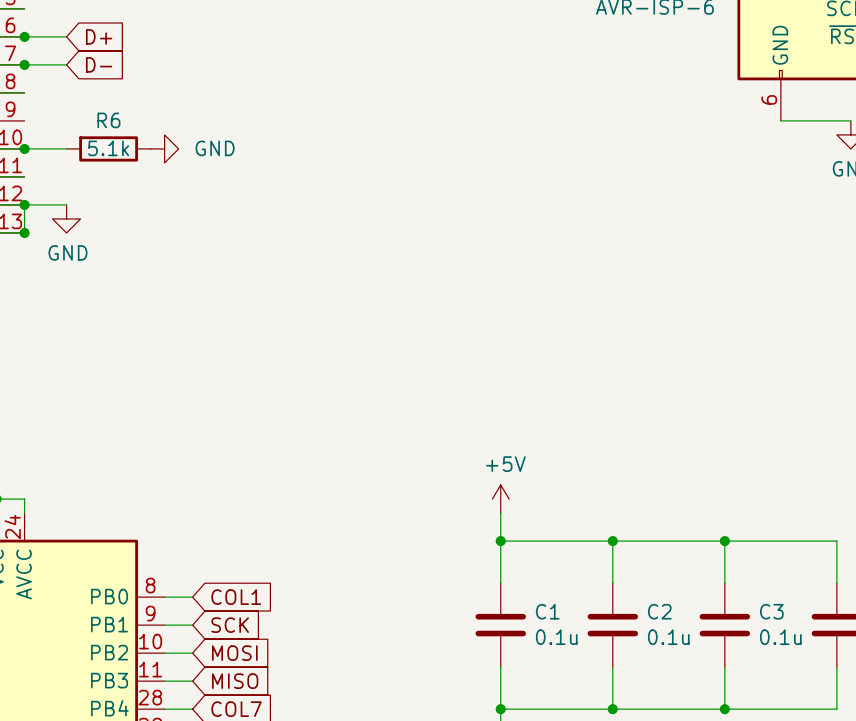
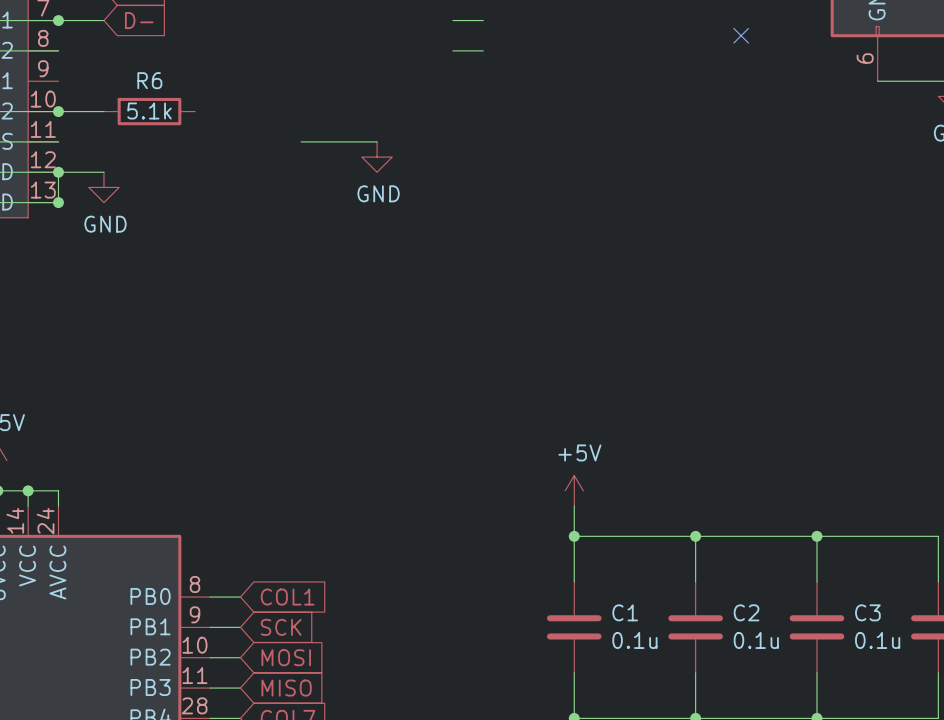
wire: none -> (452, 20) (483, 20)
no-connect mark: none -> (741, 35)
wire: none -> (452, 50) (483, 50)
power symbol: GND (164, 148) -> none
wire: none -> (301, 141) (377, 141)
power symbol: none -> GND (377, 157)

